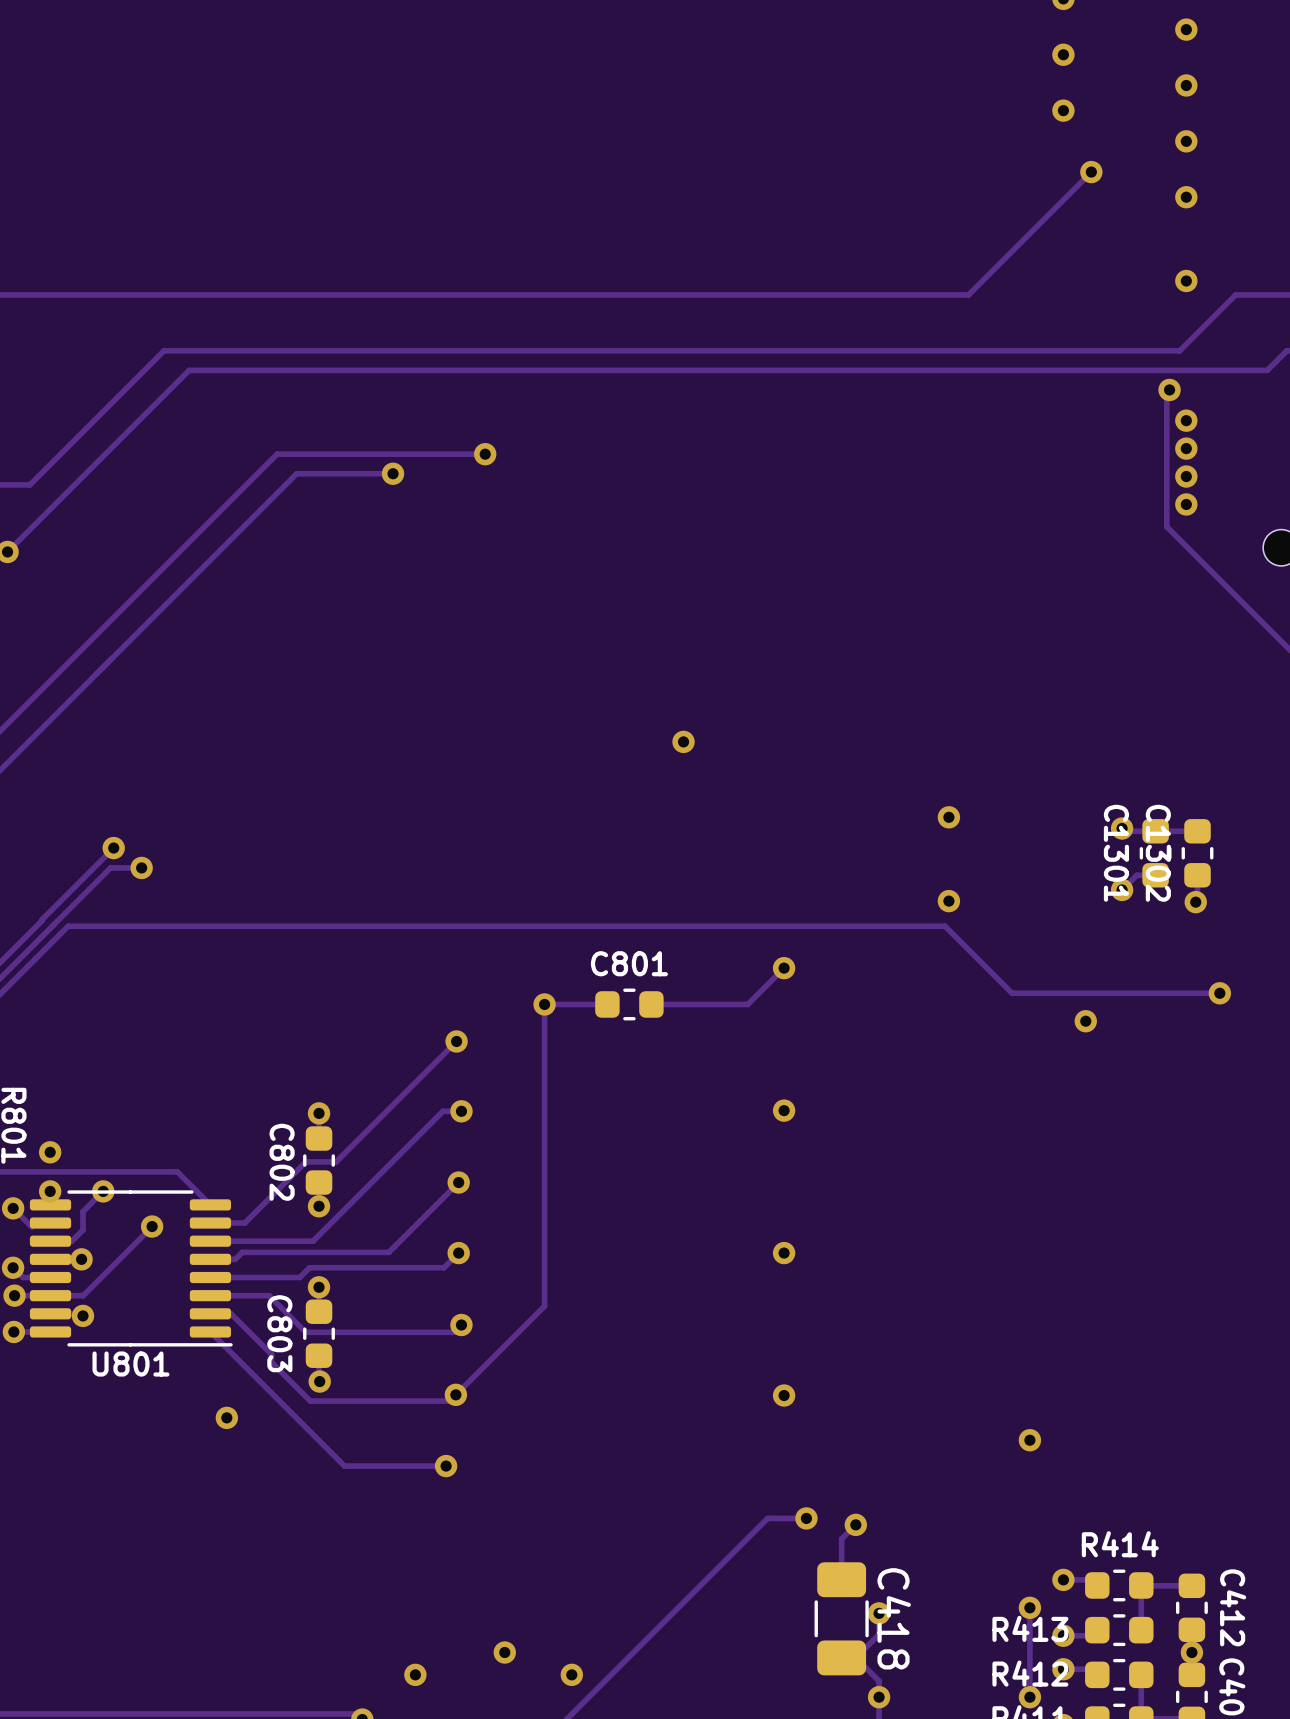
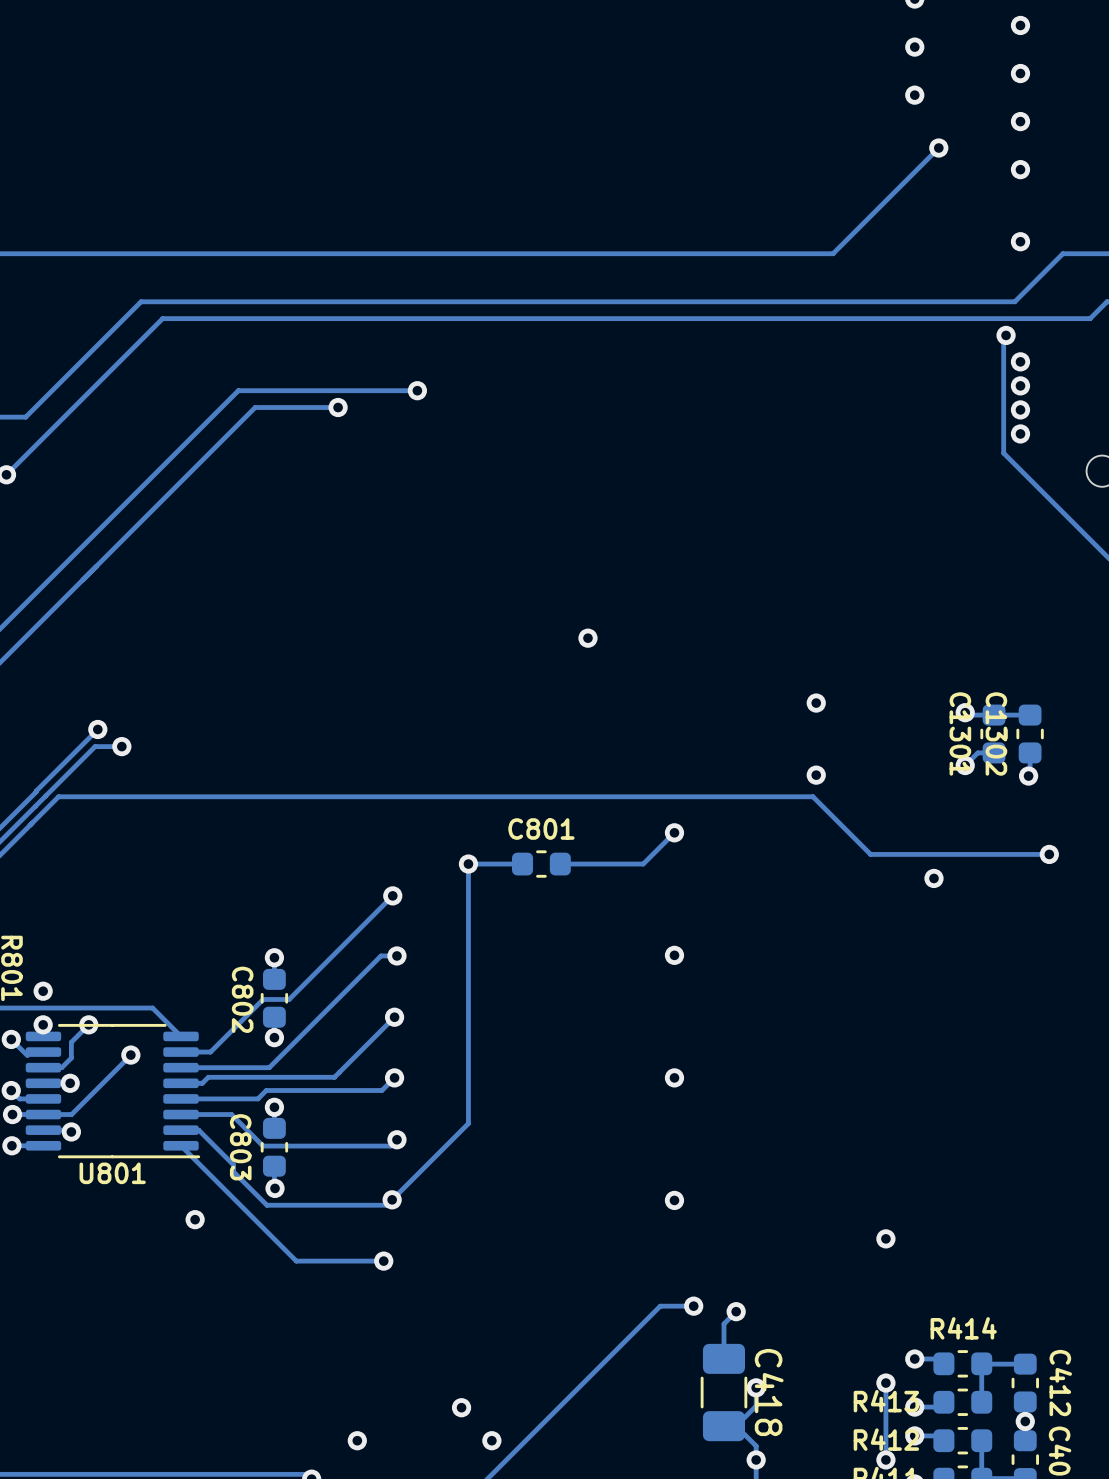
via position: (504, 1652) -> (461, 1407)

